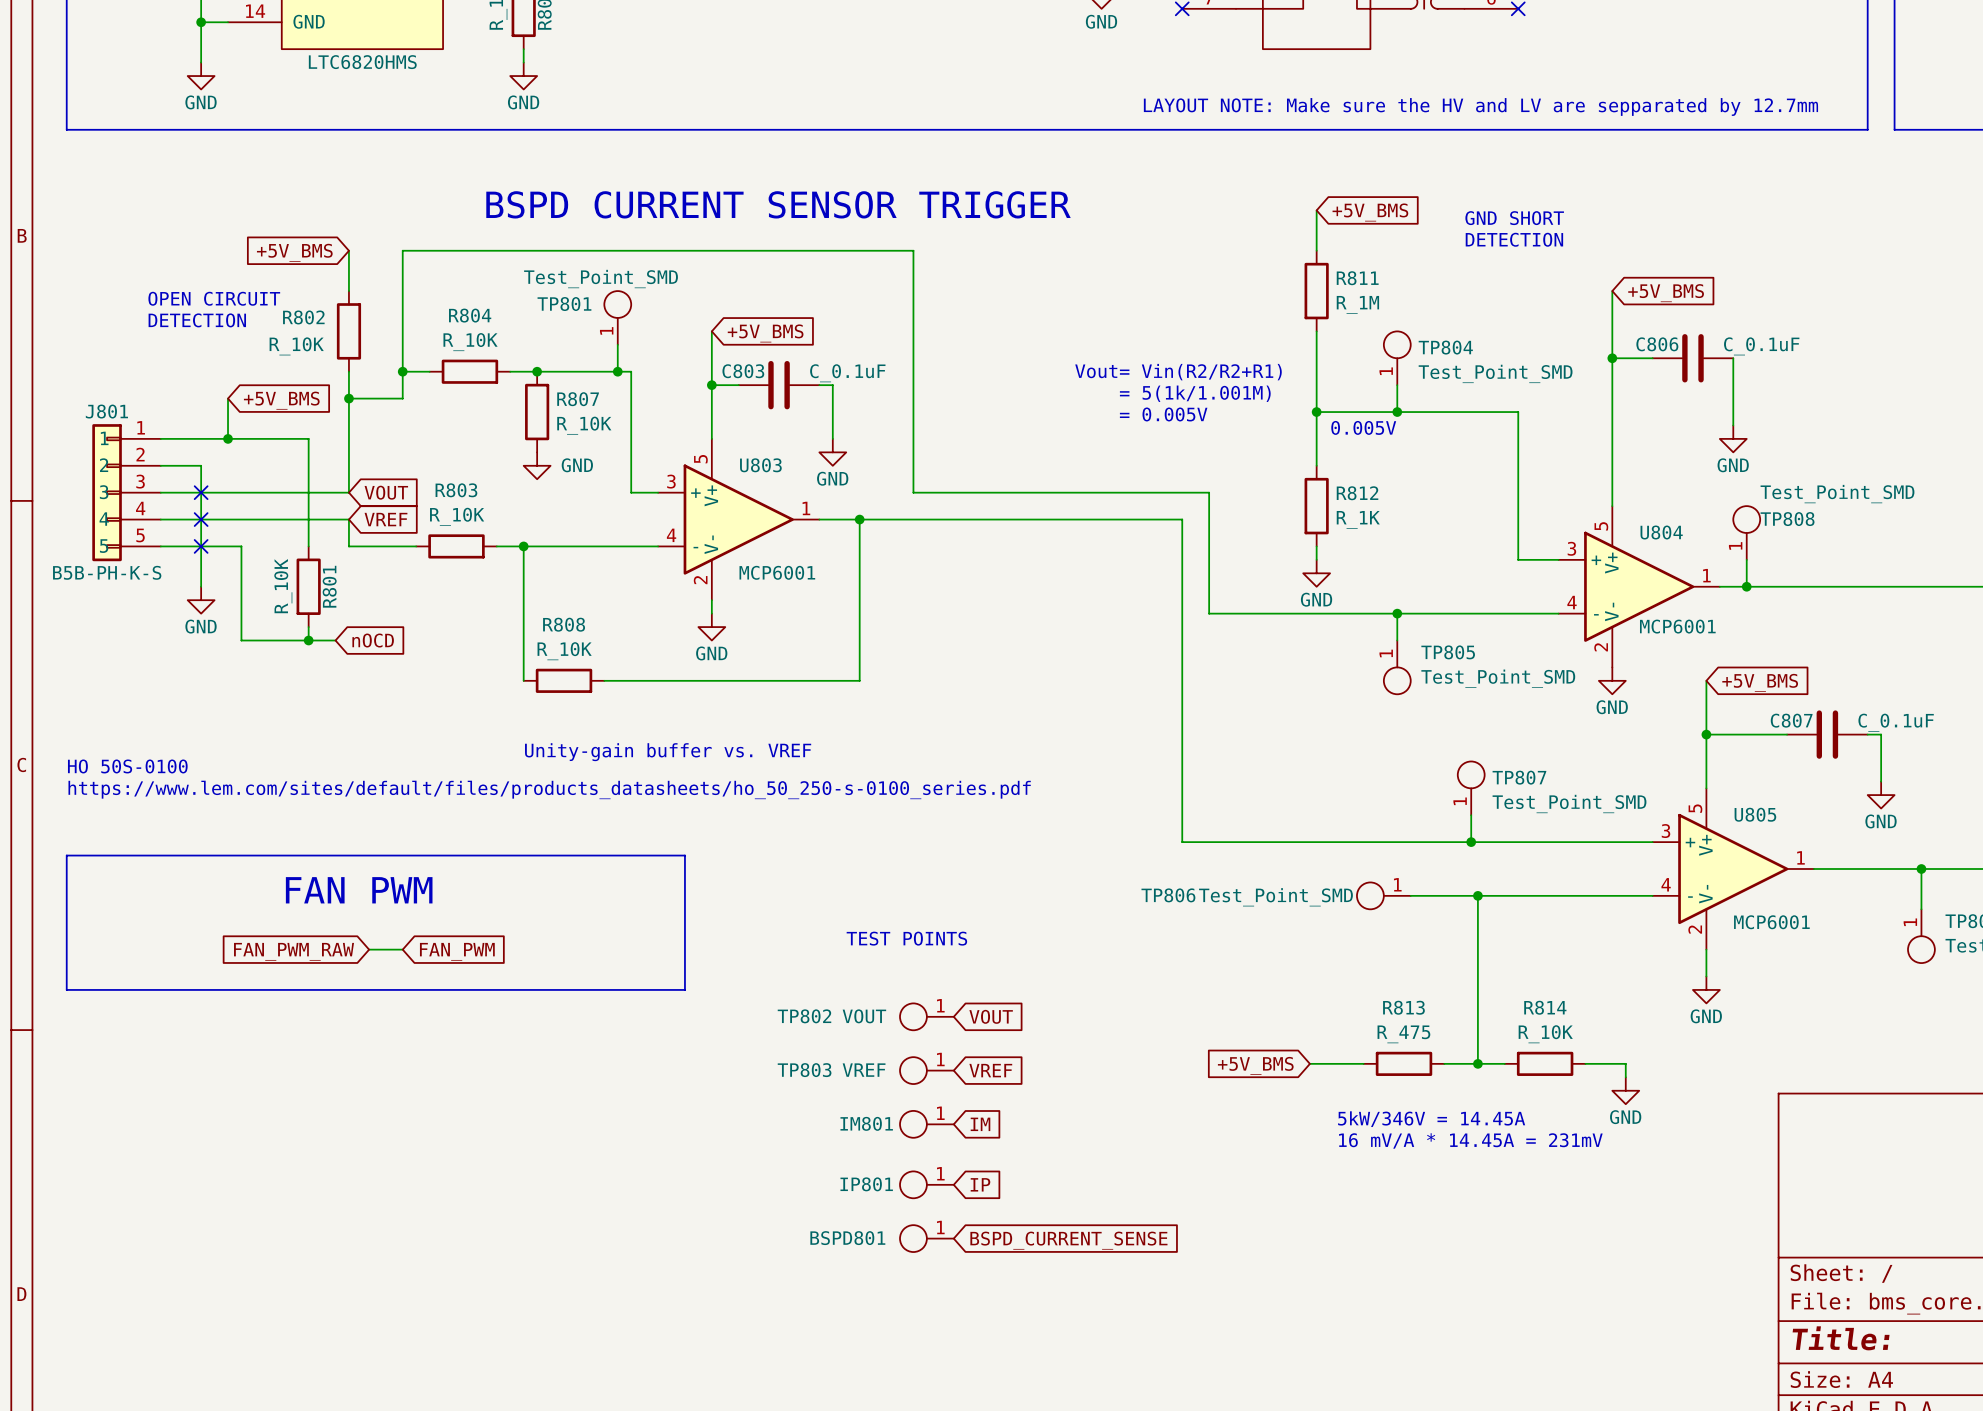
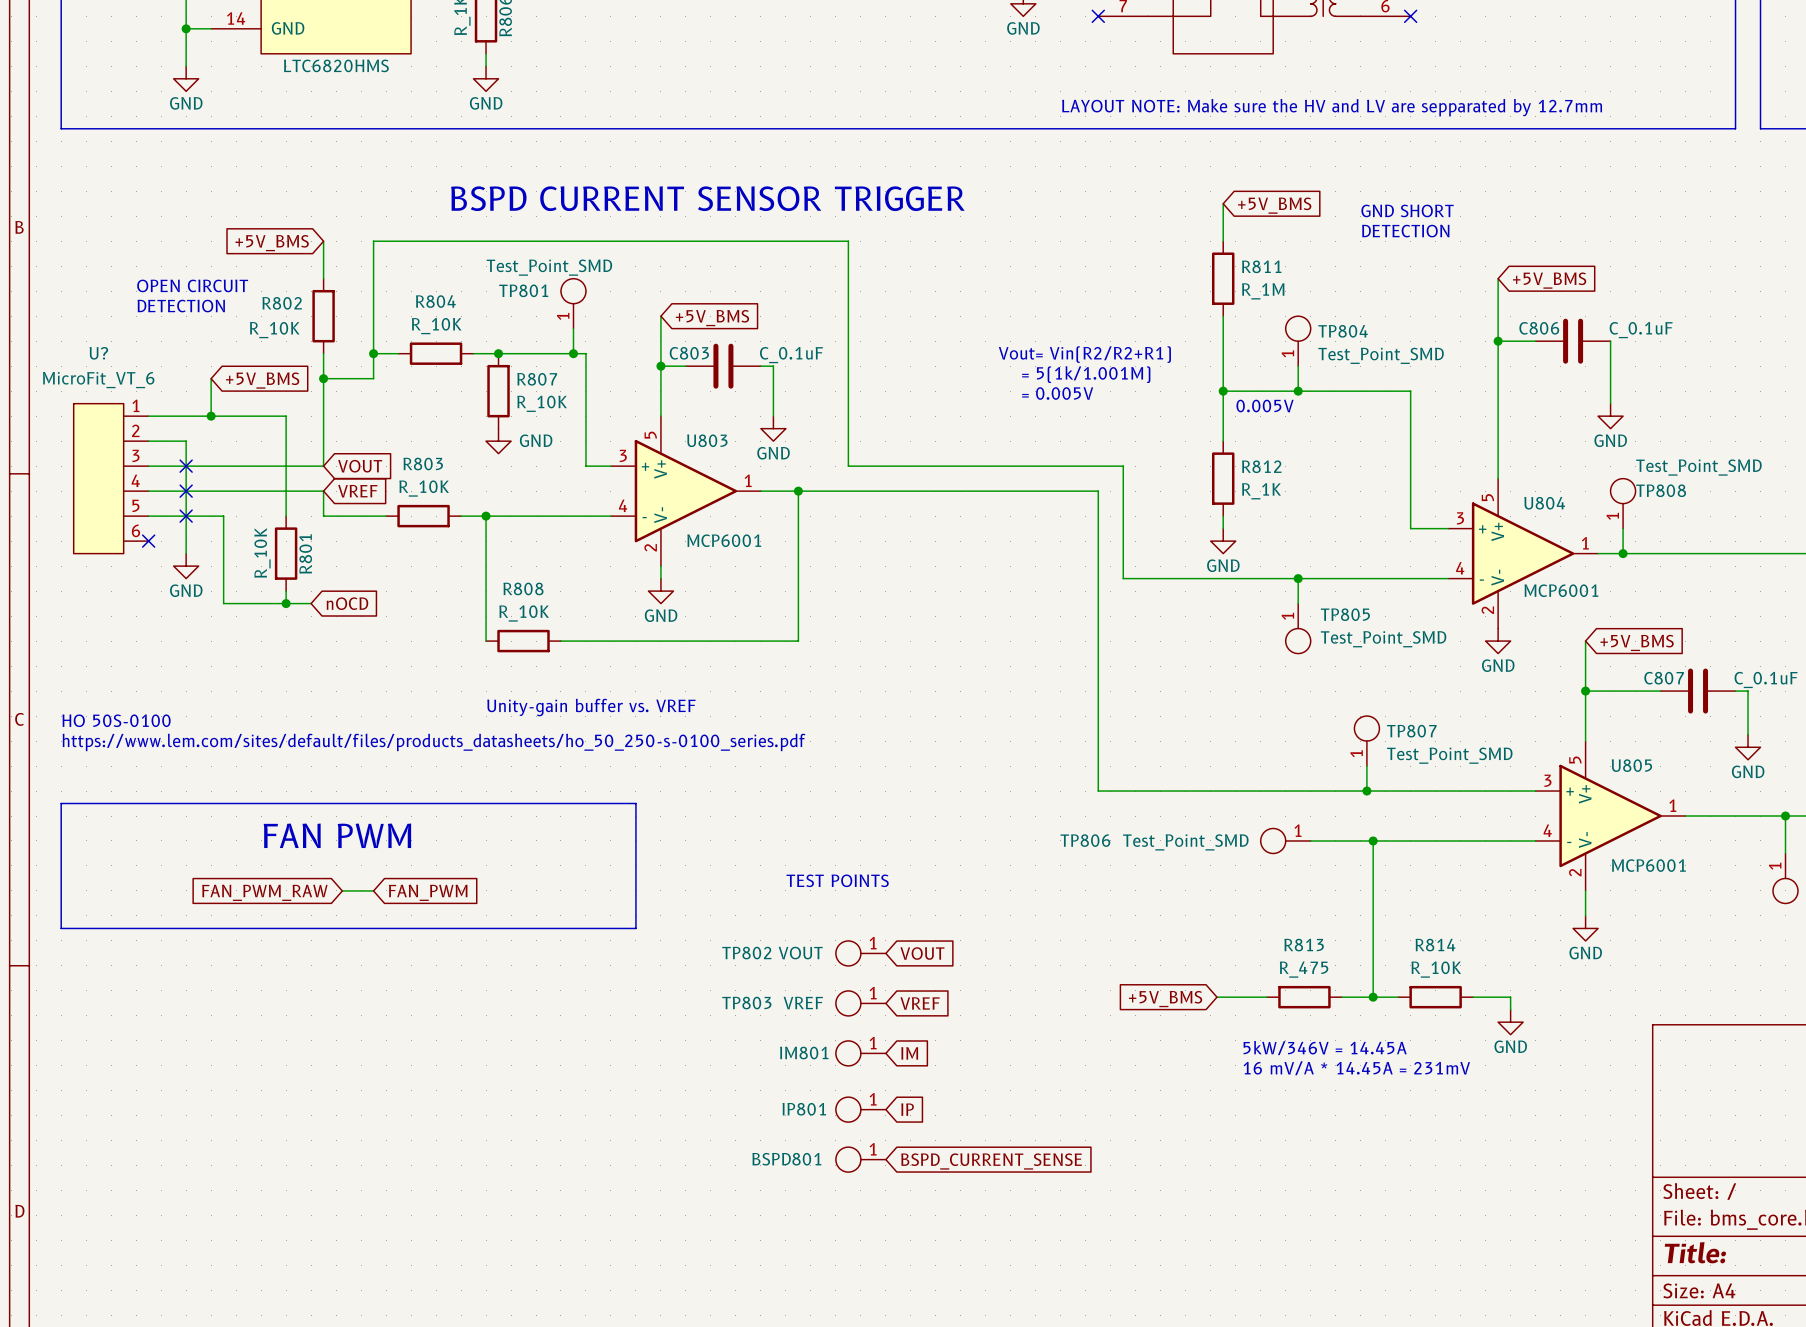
J801: B5B-PH-K-S (126, 492) -> none
U?: none -> MicroFit_VT_6 (111, 478)
no-connect mark: none -> (148, 541)

